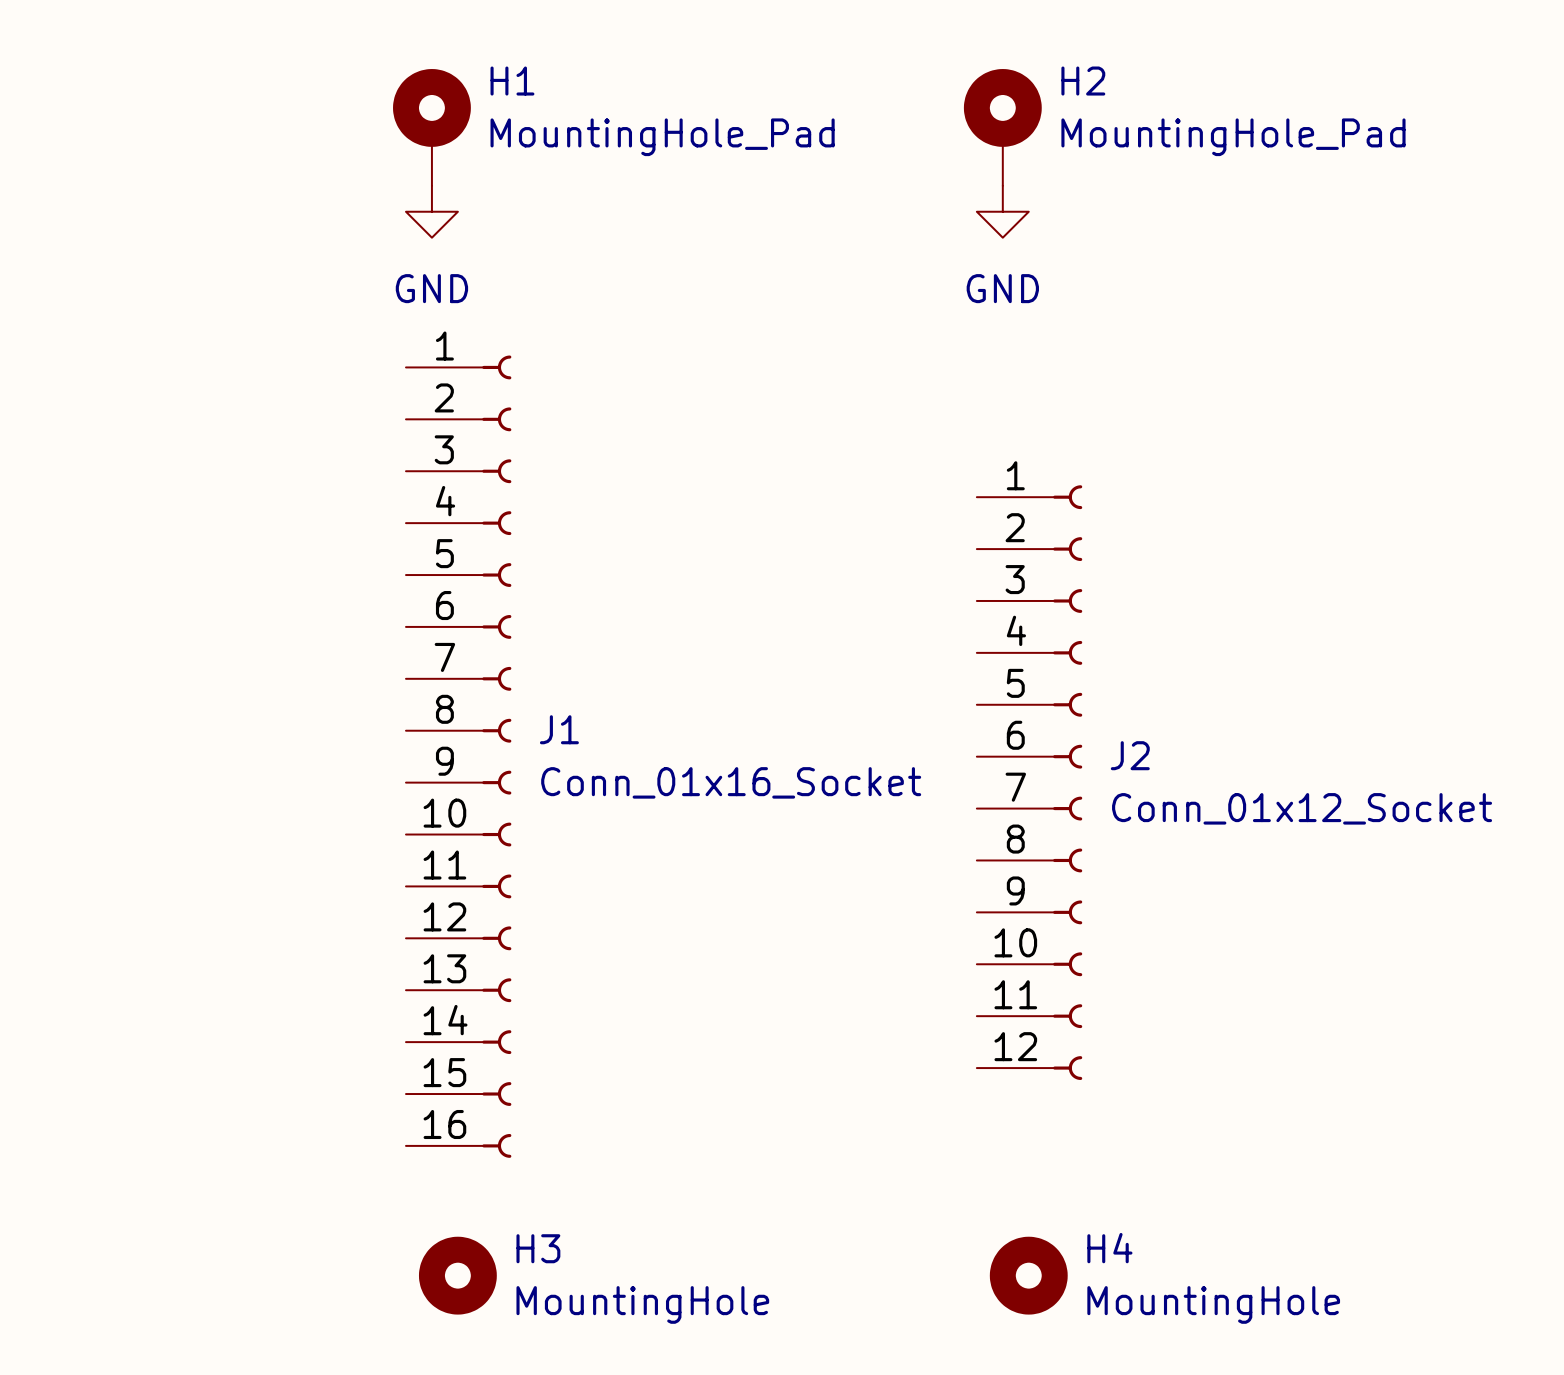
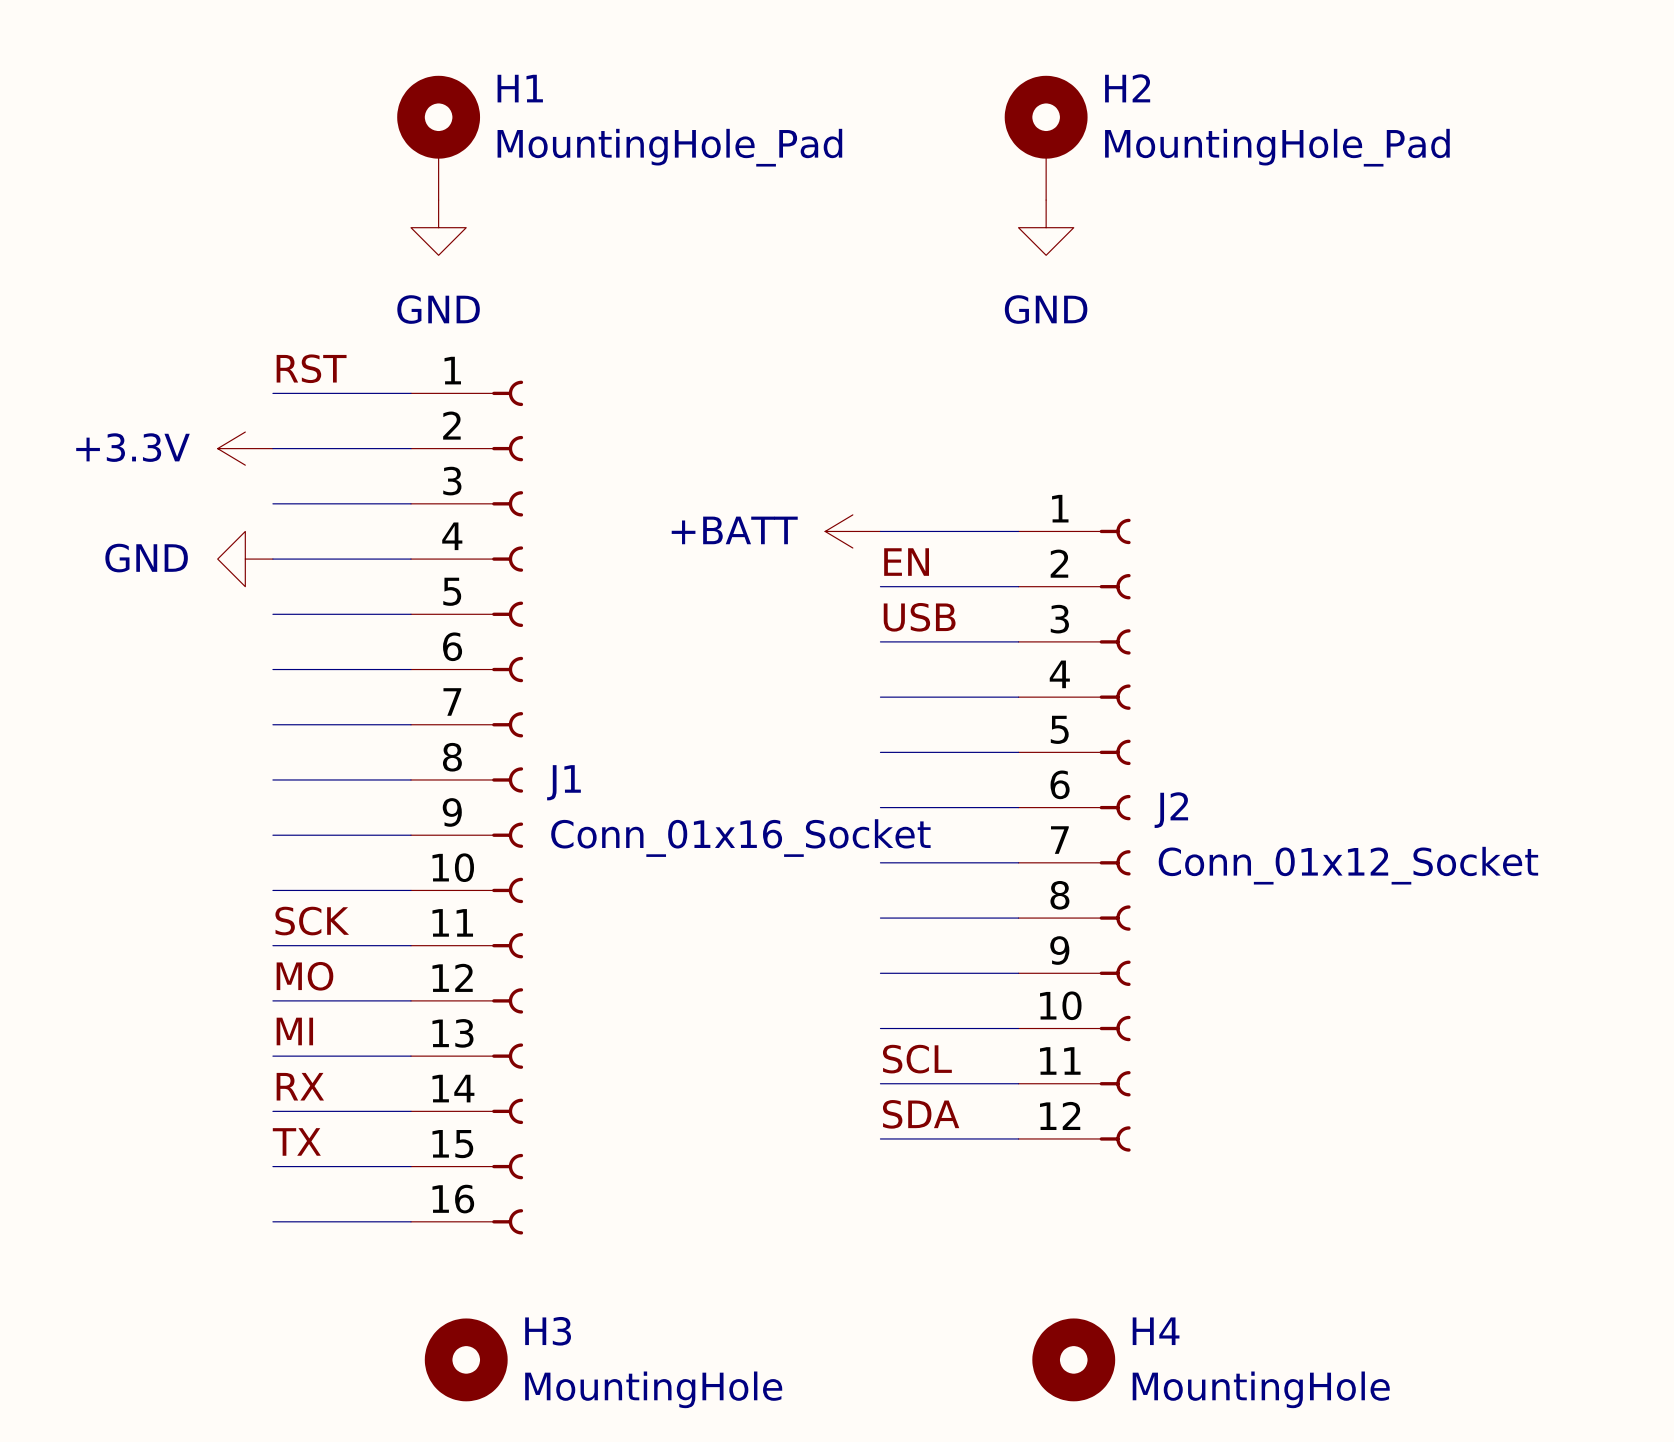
label: none -> RST (311, 368)
wire: none -> (272, 393) (411, 393)
power symbol: none -> +3.3V (245, 448)
wire: none -> (272, 448) (411, 448)
wire: none -> (272, 503) (411, 503)
power symbol: none -> +BATT (852, 531)
wire: none -> (880, 531) (1018, 531)
power symbol: none -> GND (245, 559)
wire: none -> (272, 559) (411, 559)
label: none -> EN (906, 562)
wire: none -> (880, 586) (1018, 586)
wire: none -> (272, 614) (411, 614)
label: none -> USB (919, 617)
wire: none -> (880, 641) (1018, 641)
wire: none -> (272, 669) (411, 669)
wire: none -> (880, 697) (1018, 697)
wire: none -> (272, 724) (411, 724)
wire: none -> (880, 752) (1018, 752)
wire: none -> (272, 779) (411, 779)
wire: none -> (880, 807) (1018, 807)
wire: none -> (272, 835) (411, 835)
wire: none -> (880, 862) (1018, 862)
wire: none -> (272, 890) (411, 890)
wire: none -> (880, 918) (1018, 918)
label: none -> SCK (312, 921)
wire: none -> (272, 945) (411, 945)
wire: none -> (880, 973) (1018, 973)
label: none -> MO (304, 976)
wire: none -> (272, 1000) (411, 1000)
wire: none -> (880, 1028) (1018, 1028)
label: none -> MI (294, 1031)
wire: none -> (272, 1056) (411, 1056)
label: none -> SCL (917, 1059)
wire: none -> (880, 1083) (1018, 1083)
label: none -> RX (300, 1086)
wire: none -> (272, 1111) (411, 1111)
label: none -> SDA (921, 1114)
wire: none -> (880, 1138) (1018, 1138)
label: none -> TX (296, 1141)
wire: none -> (272, 1166) (411, 1166)
wire: none -> (272, 1221) (411, 1221)

